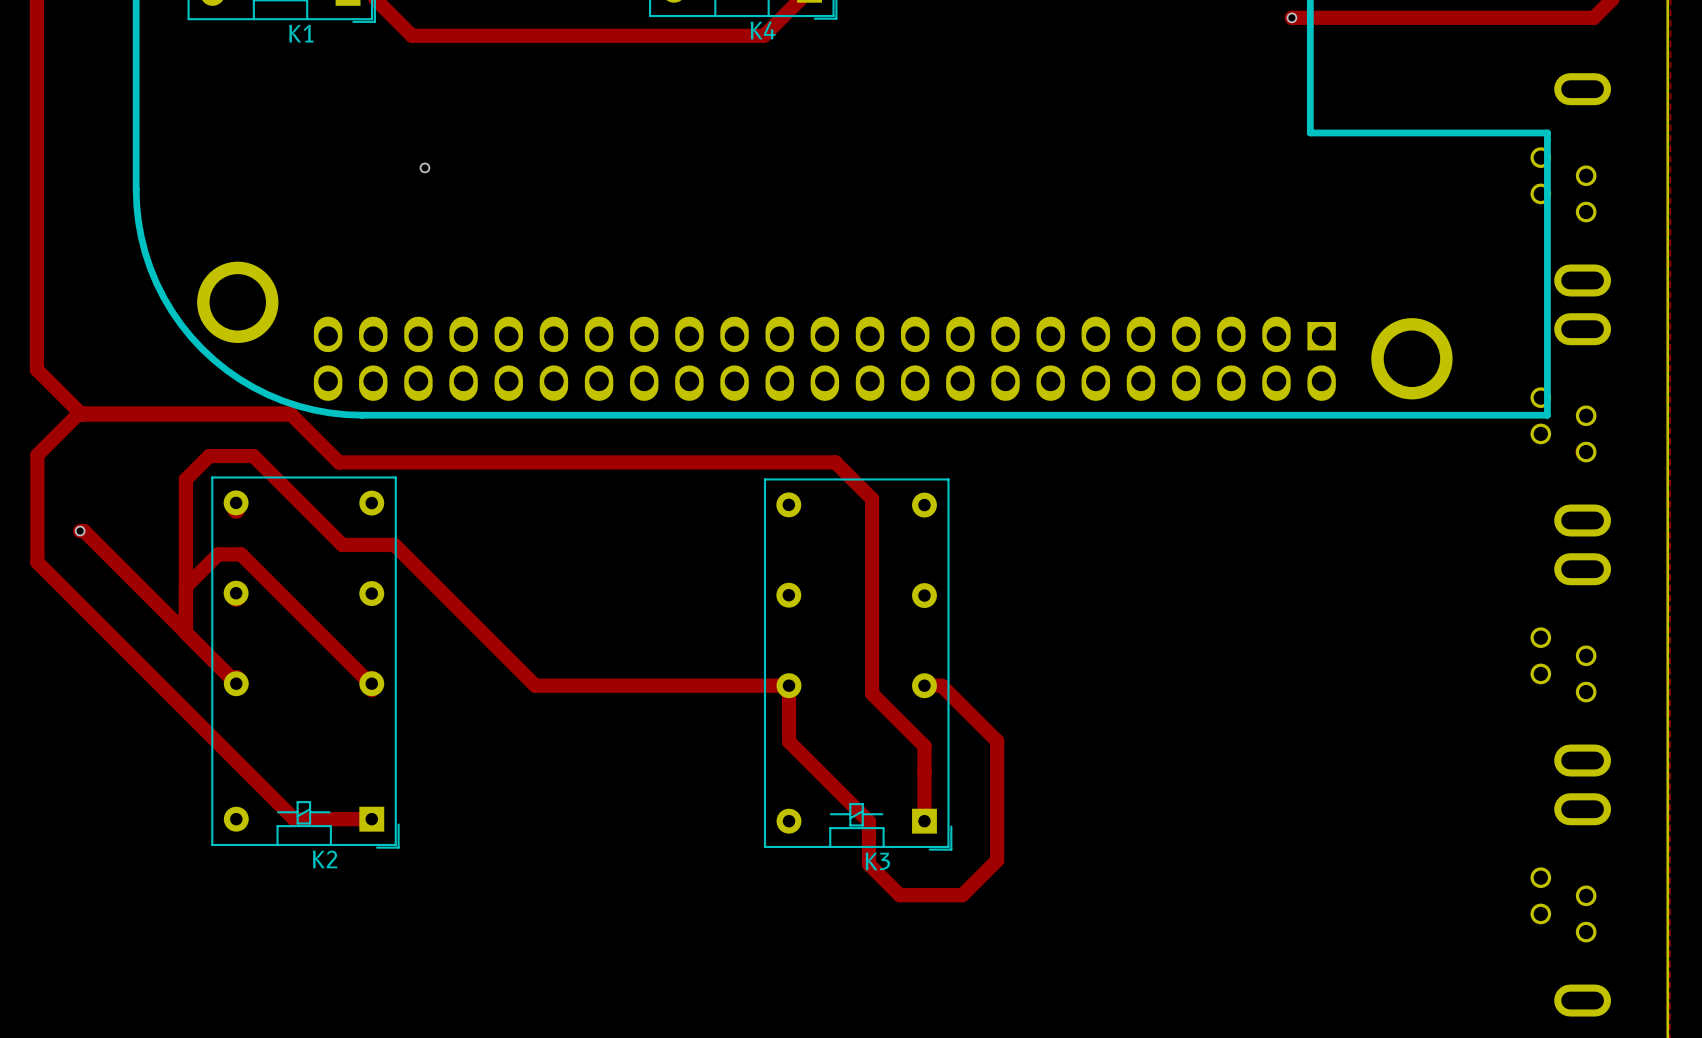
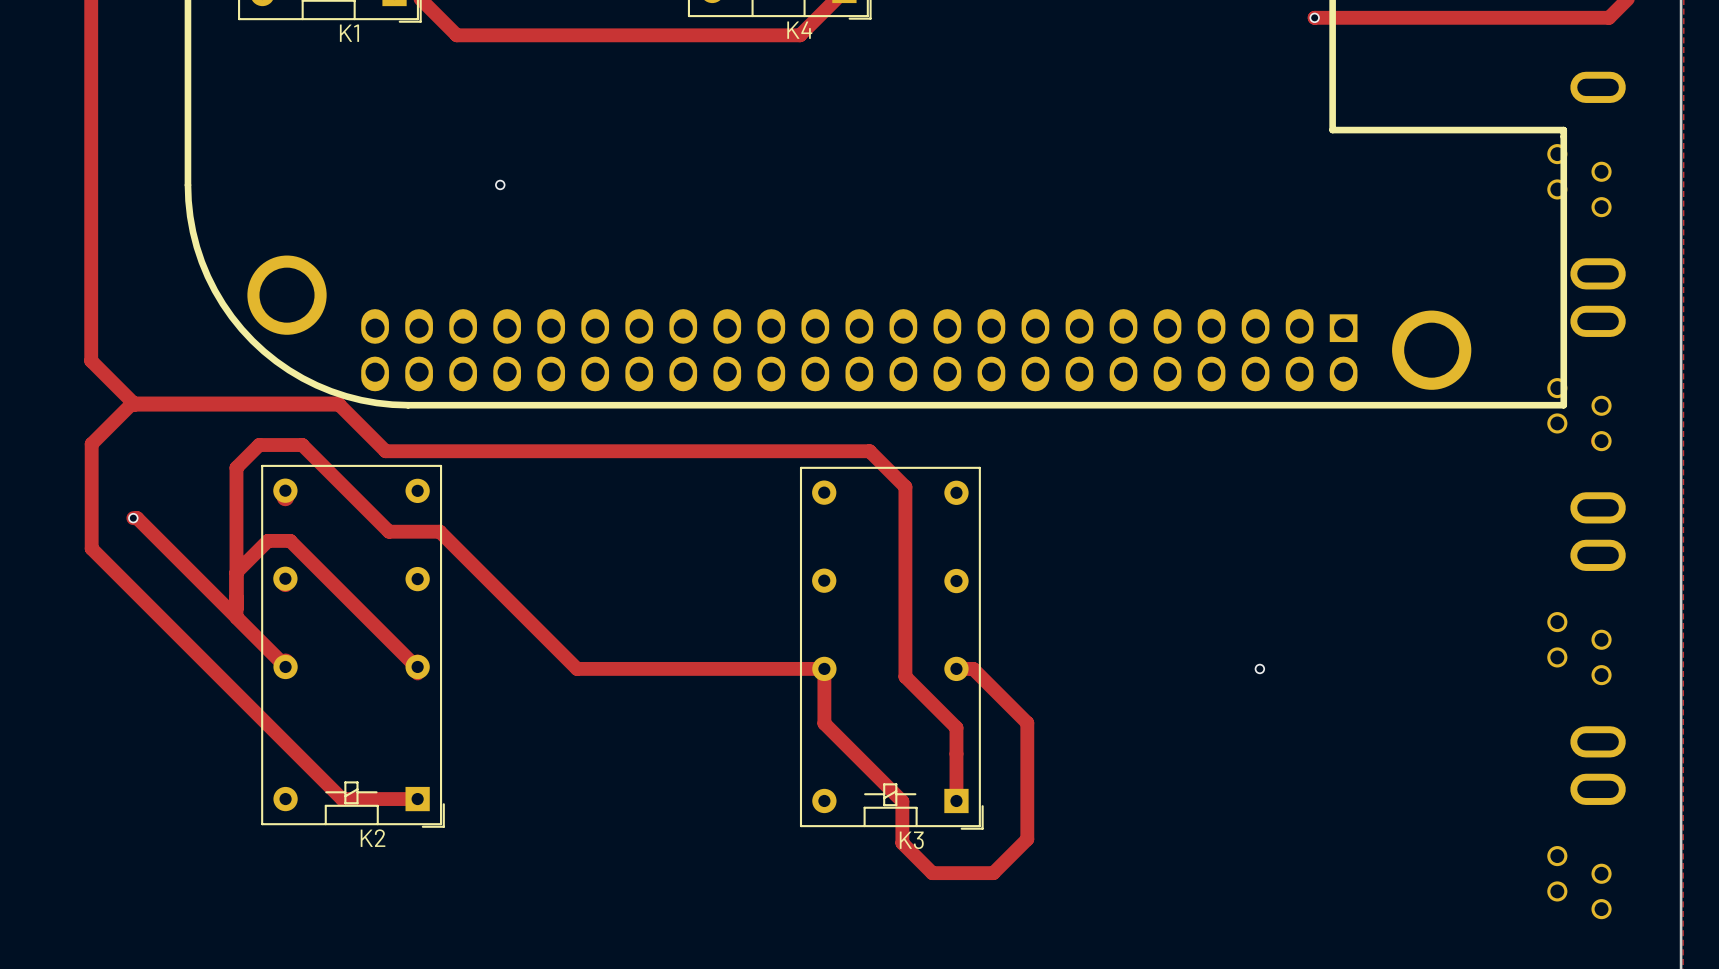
via position: (424, 167) -> (500, 184)
via: none -> (1259, 668)

